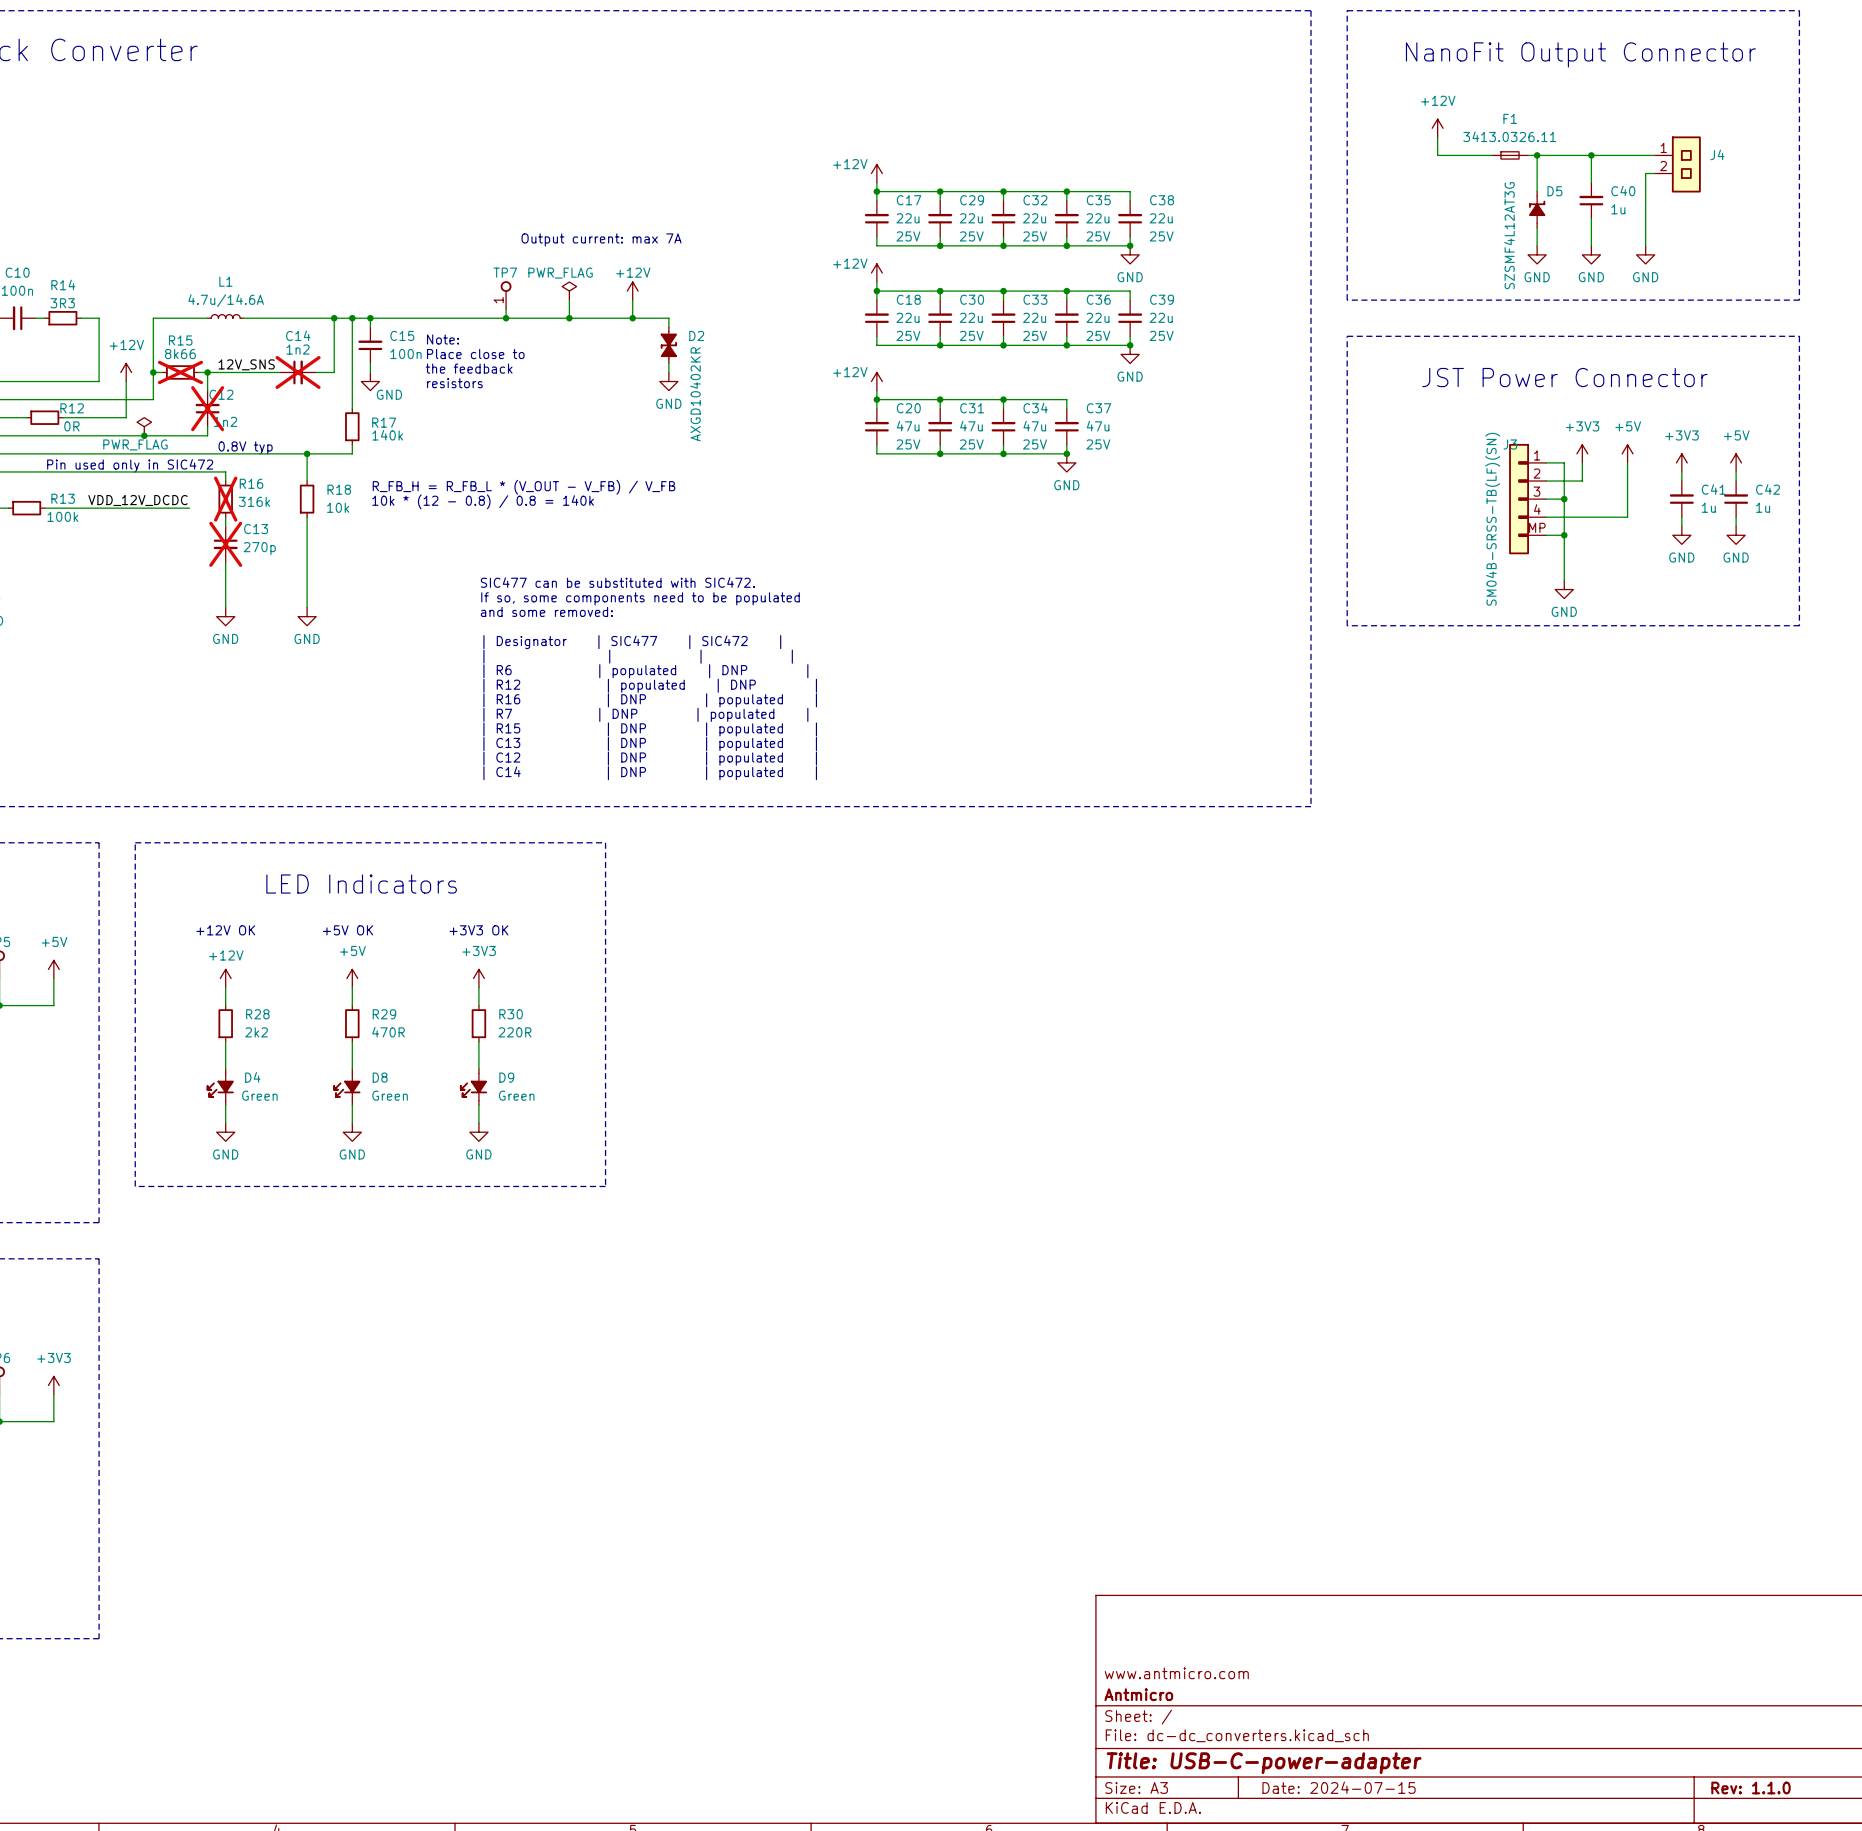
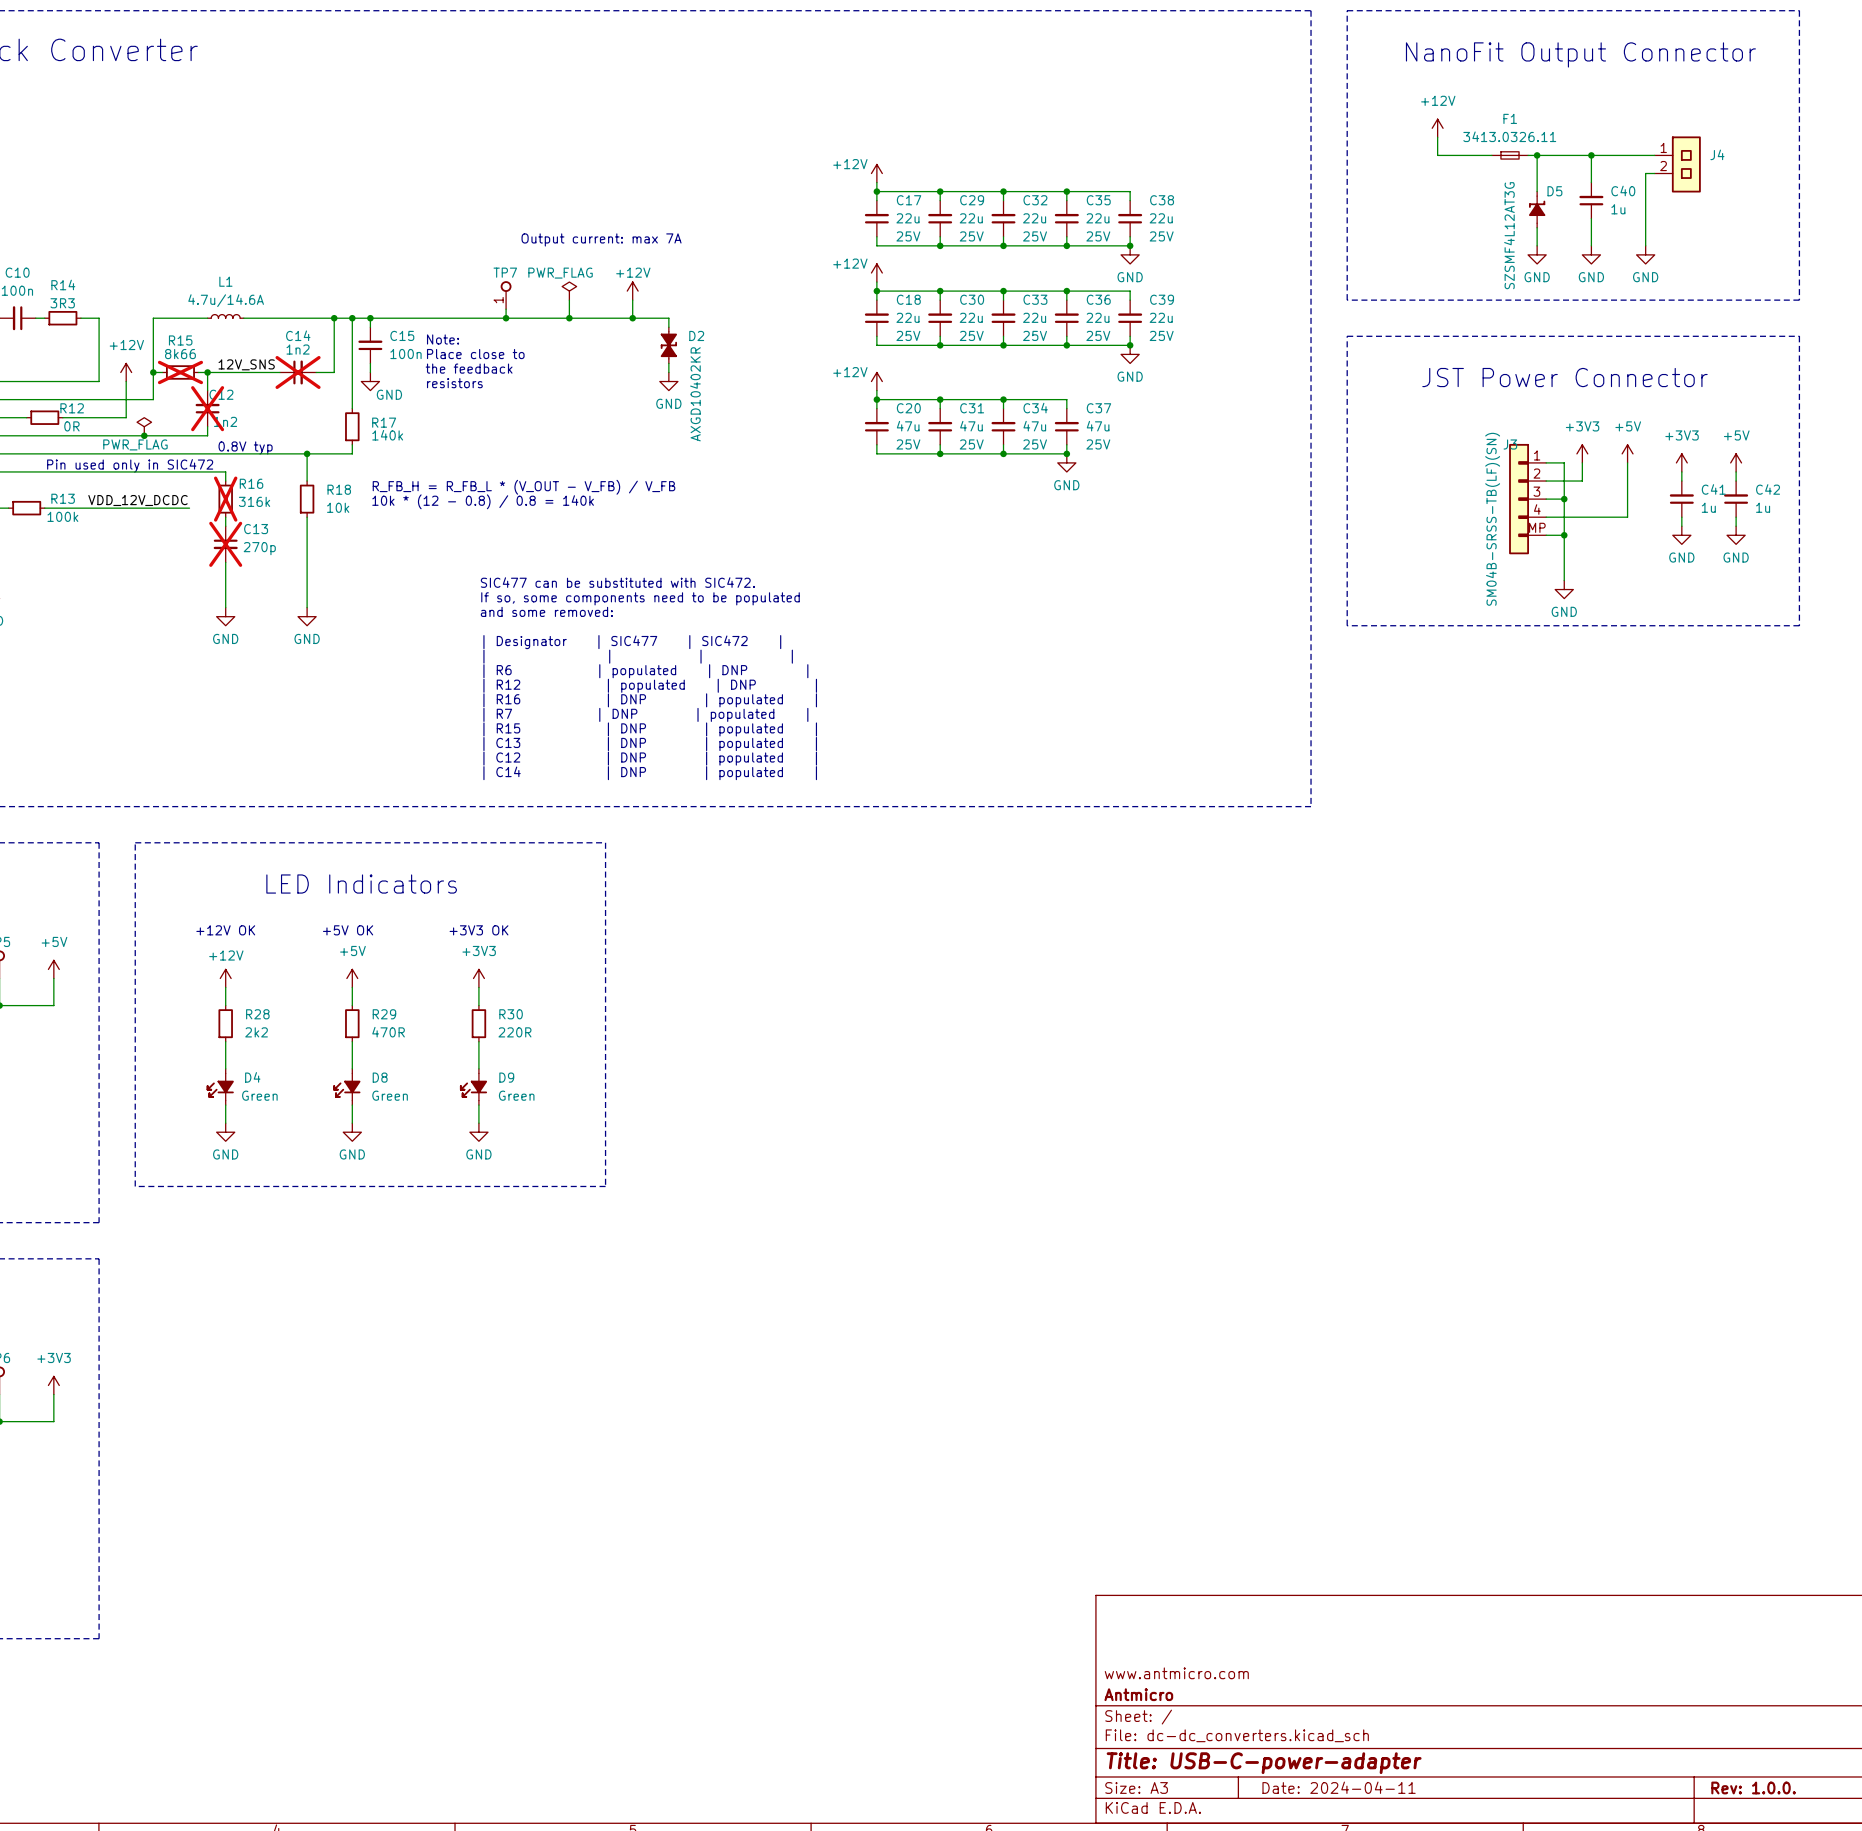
title block: Date: 2024-07-15 (1339, 1787) -> Date: 2024-04-11 (1339, 1787)
title block: Rev: 1.1.0 (1751, 1787) -> Rev: 1.0.0. (1753, 1787)

